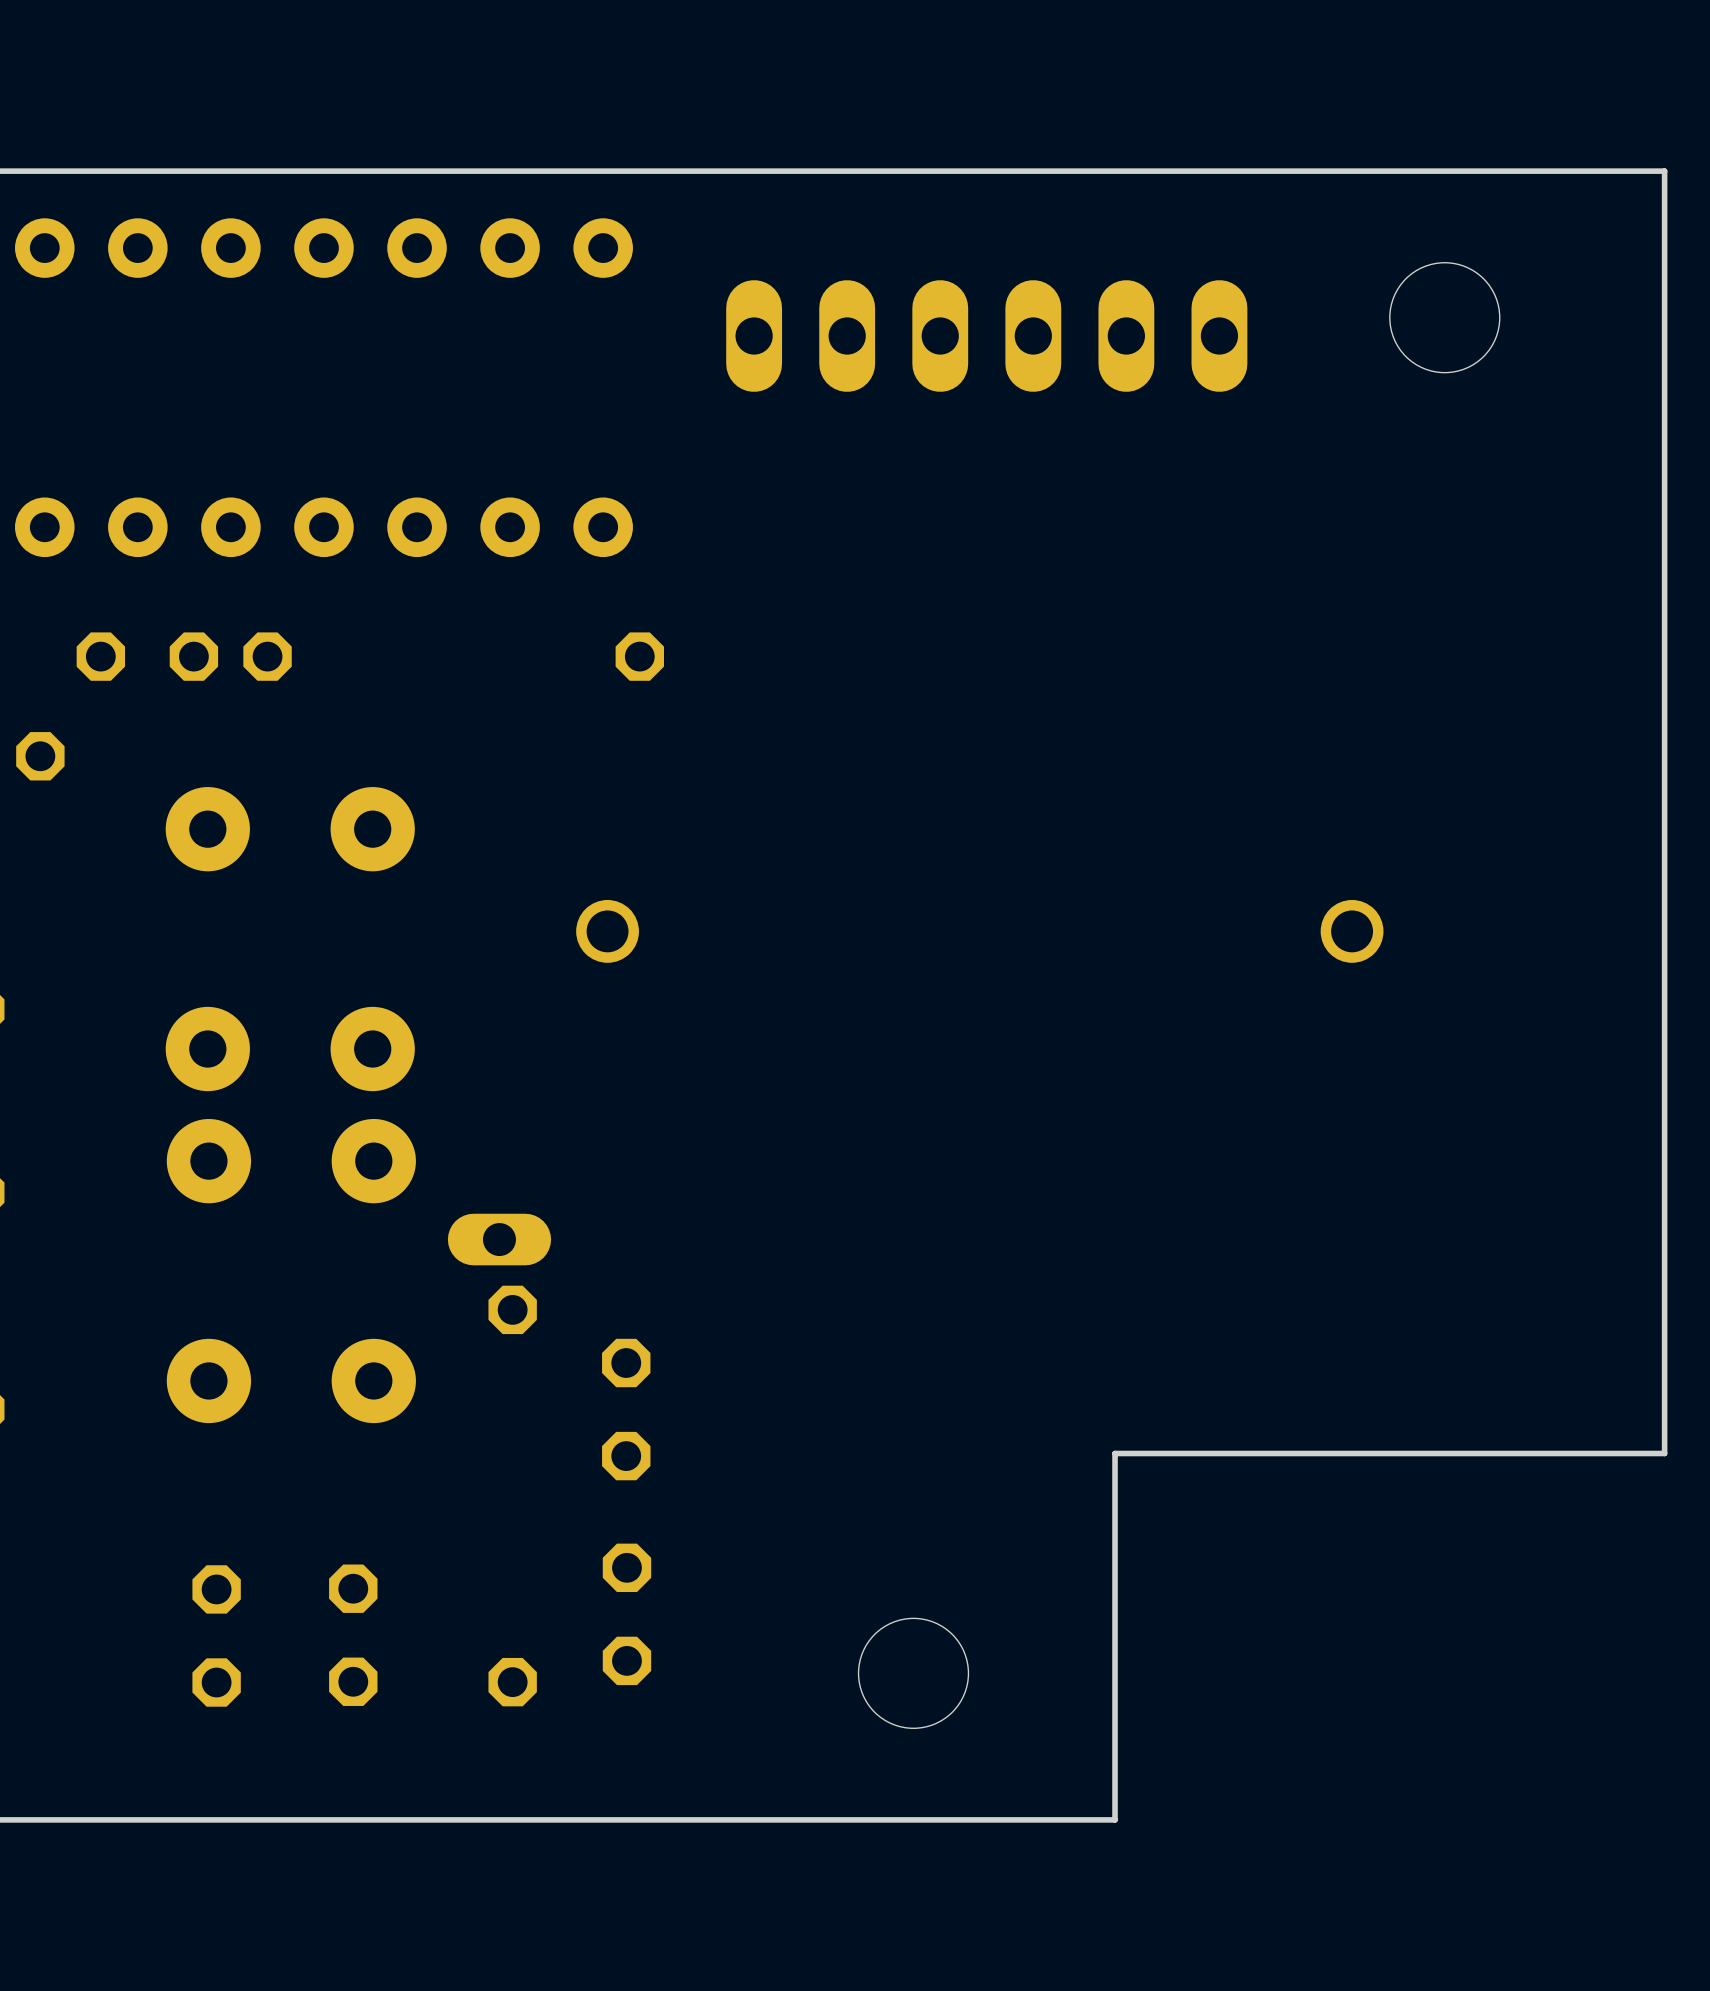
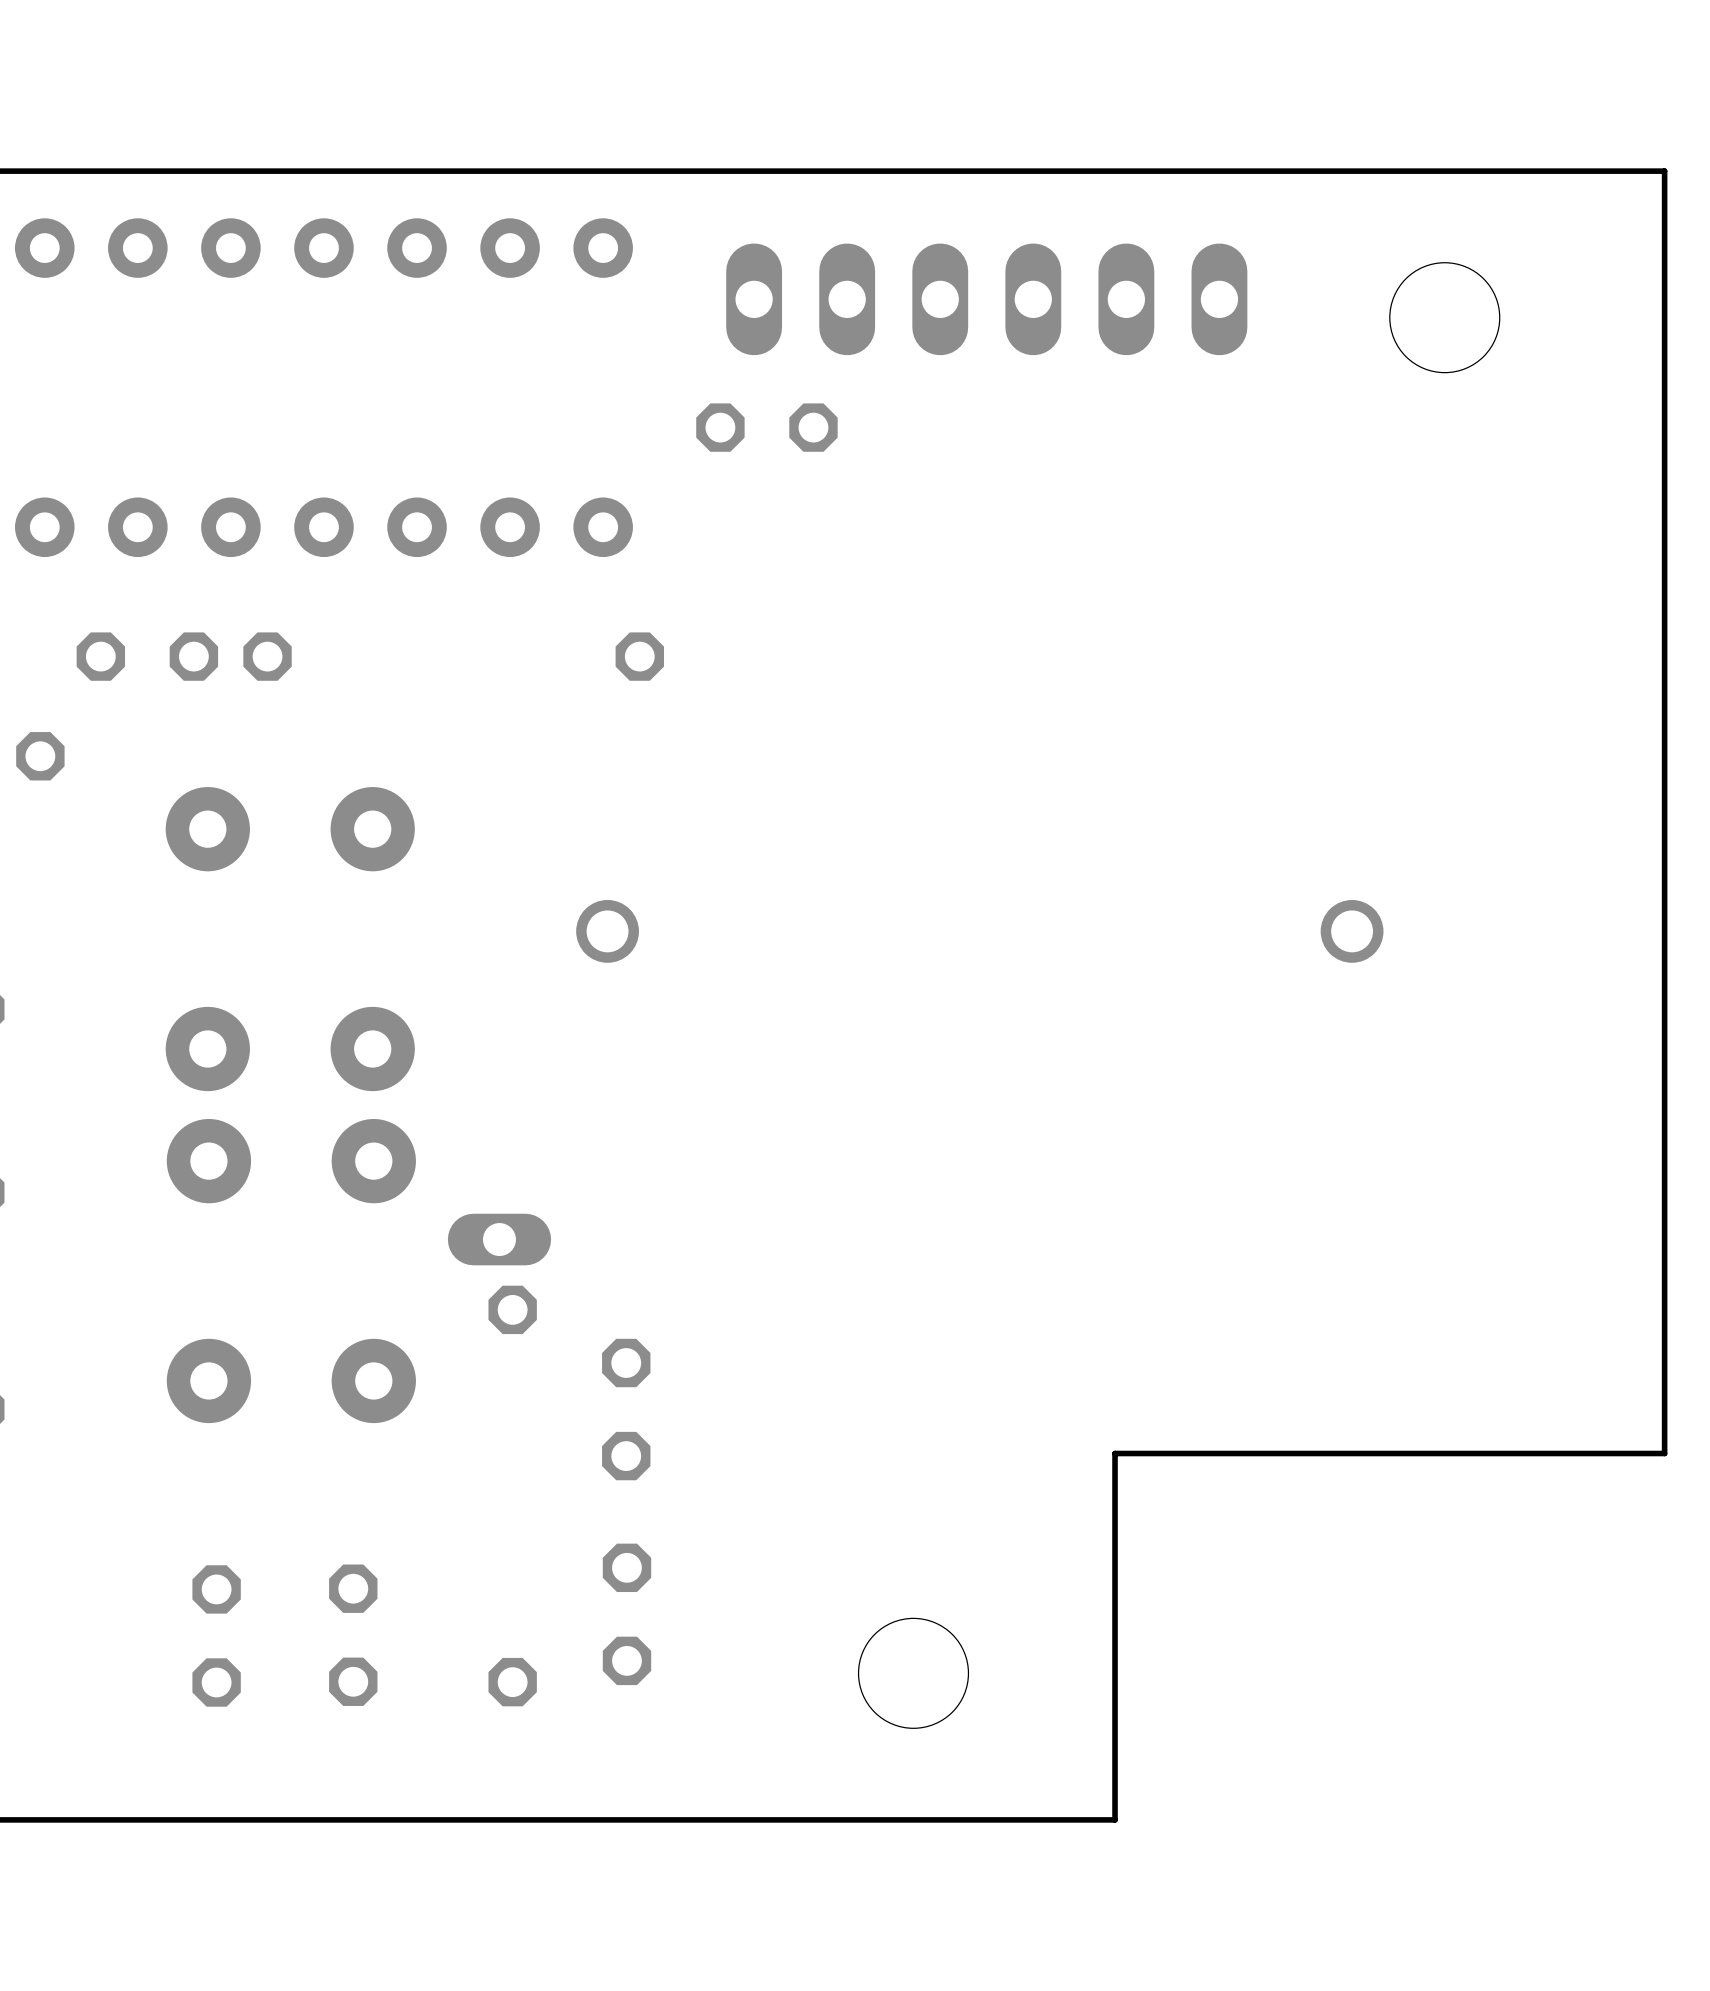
part position: (986, 336) -> (986, 299)
part: none -> (766, 427)

